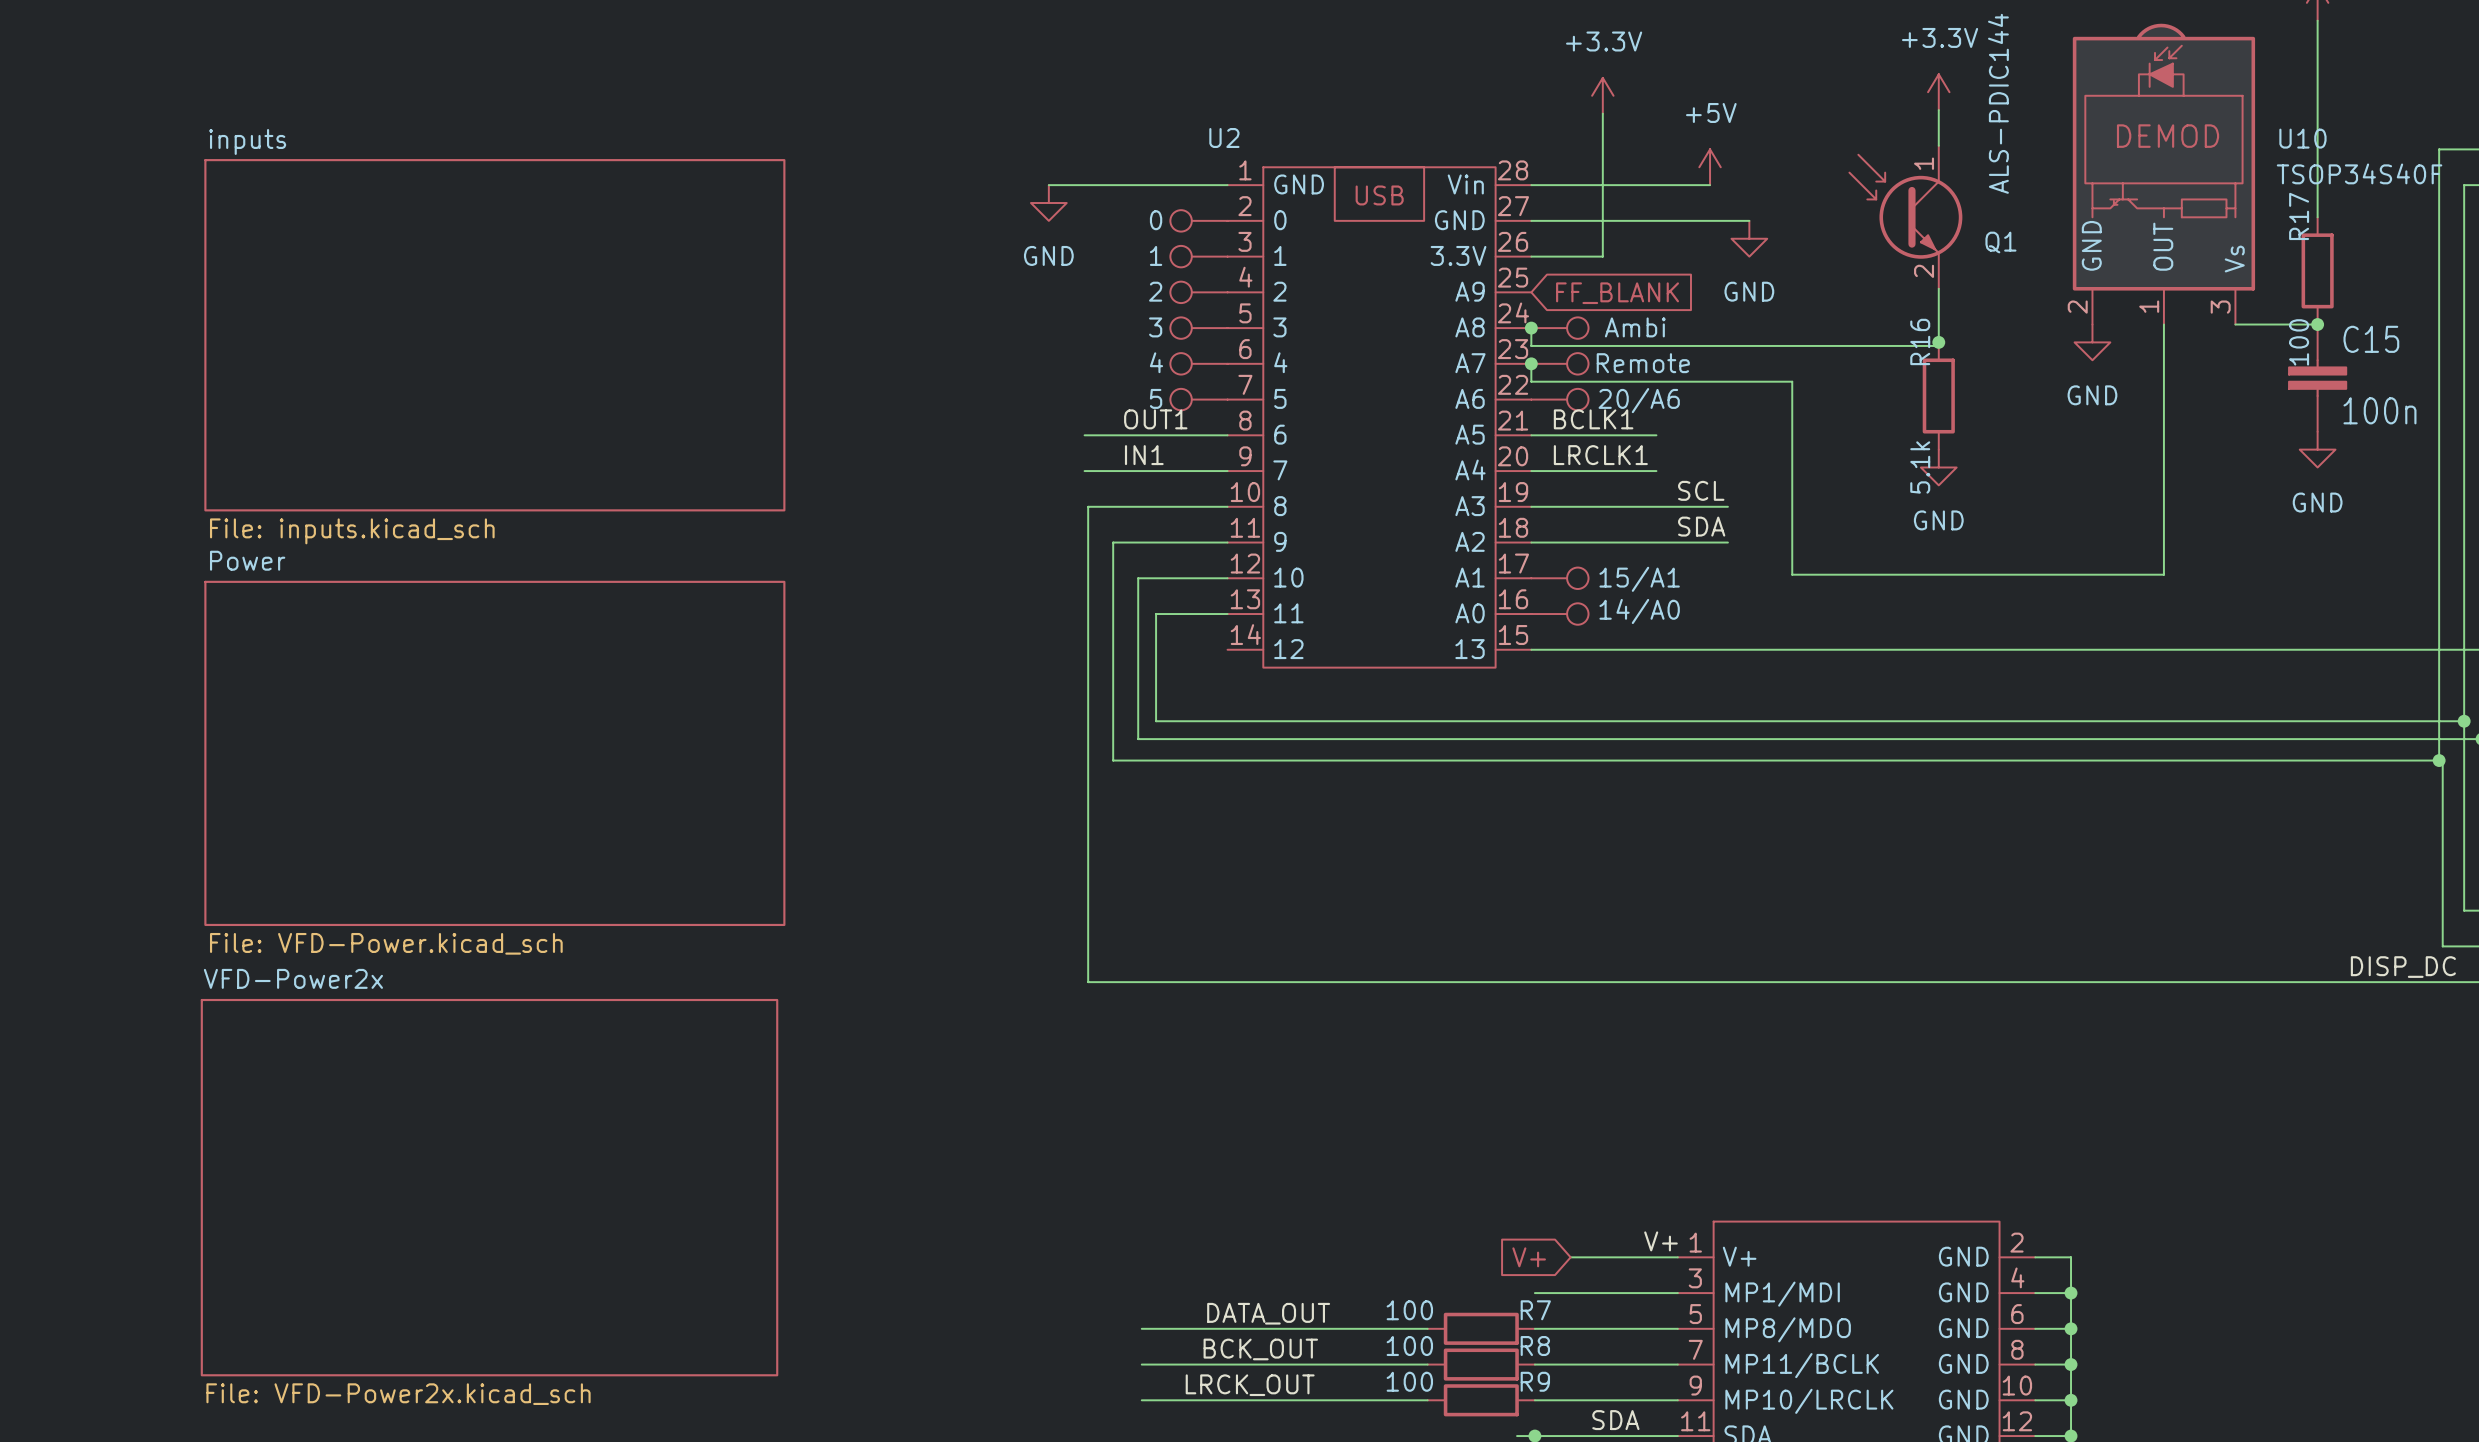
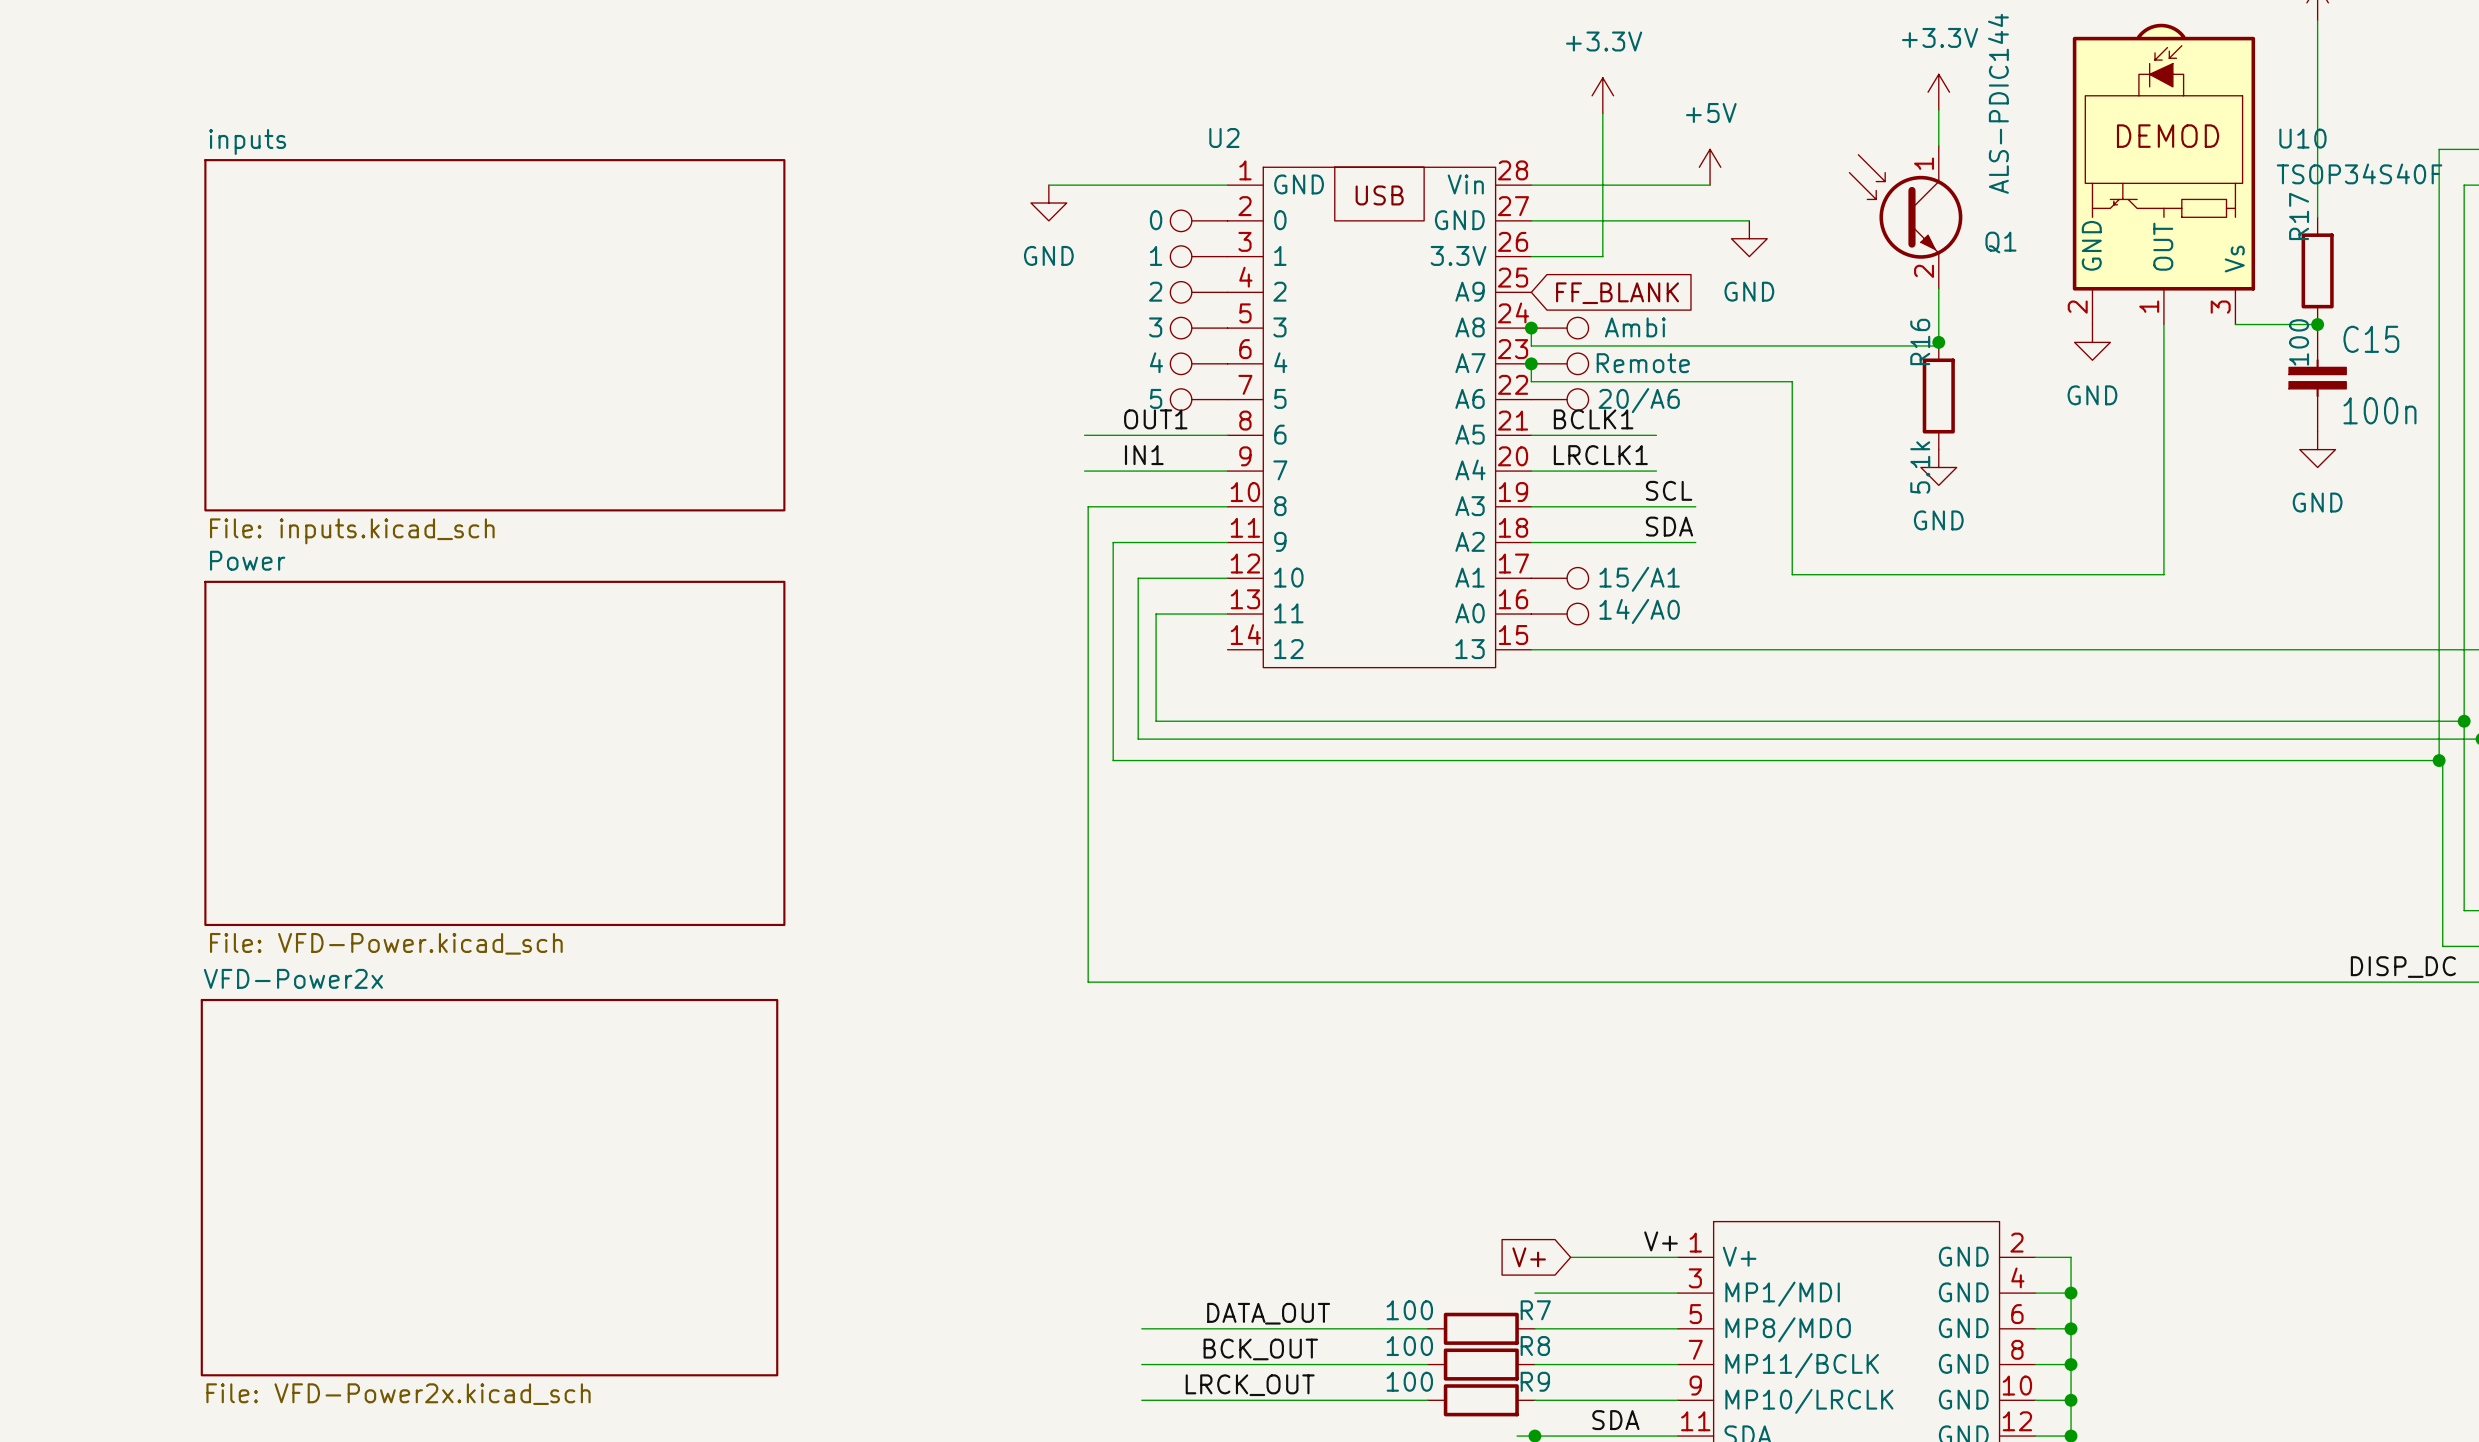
label position: SCL (1701, 490) -> SCL (1669, 490)
wire: (1695, 506) (1727, 506) -> none
label position: SDA (1701, 526) -> SDA (1669, 526)
wire: (1695, 542) (1727, 542) -> none

